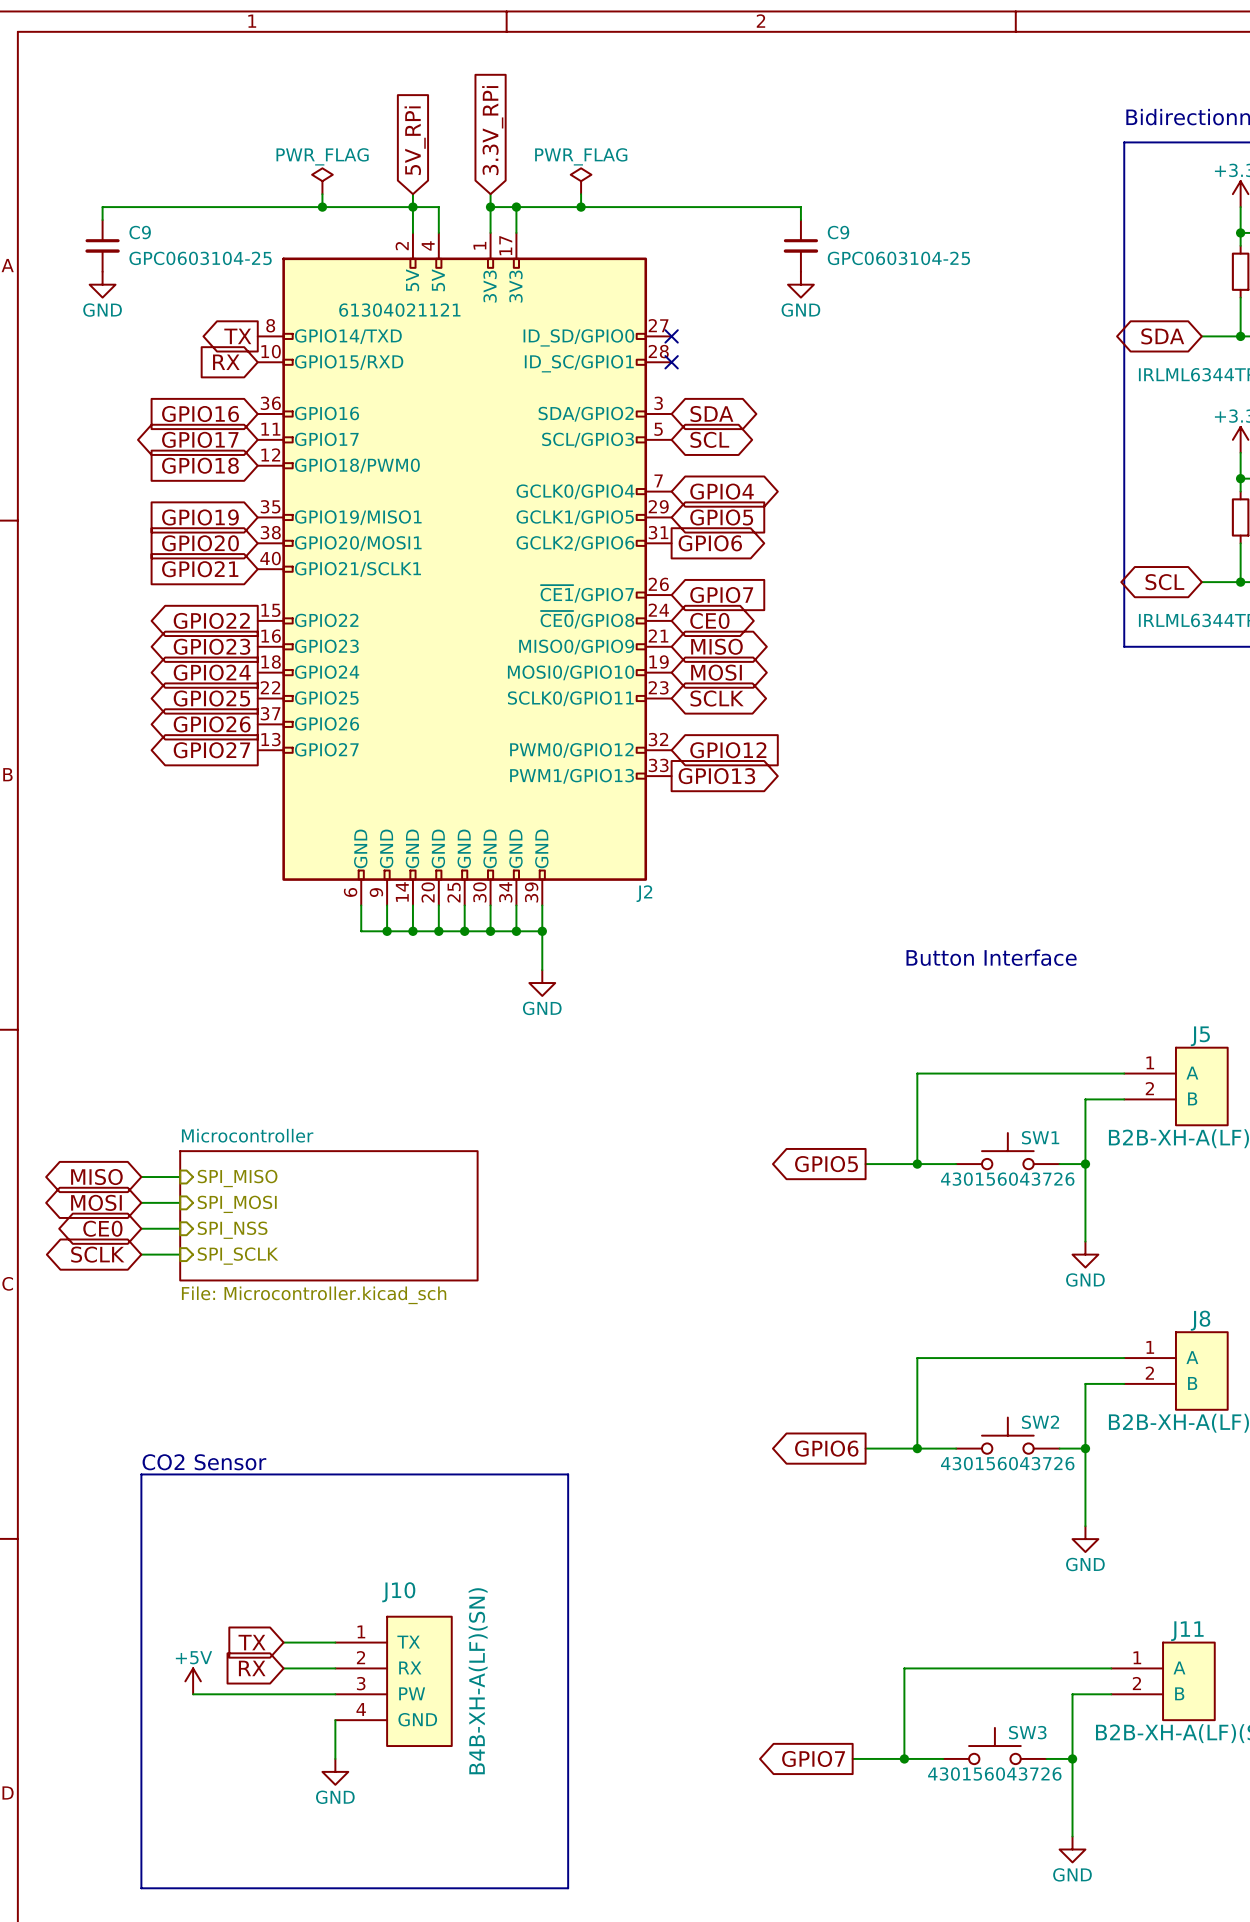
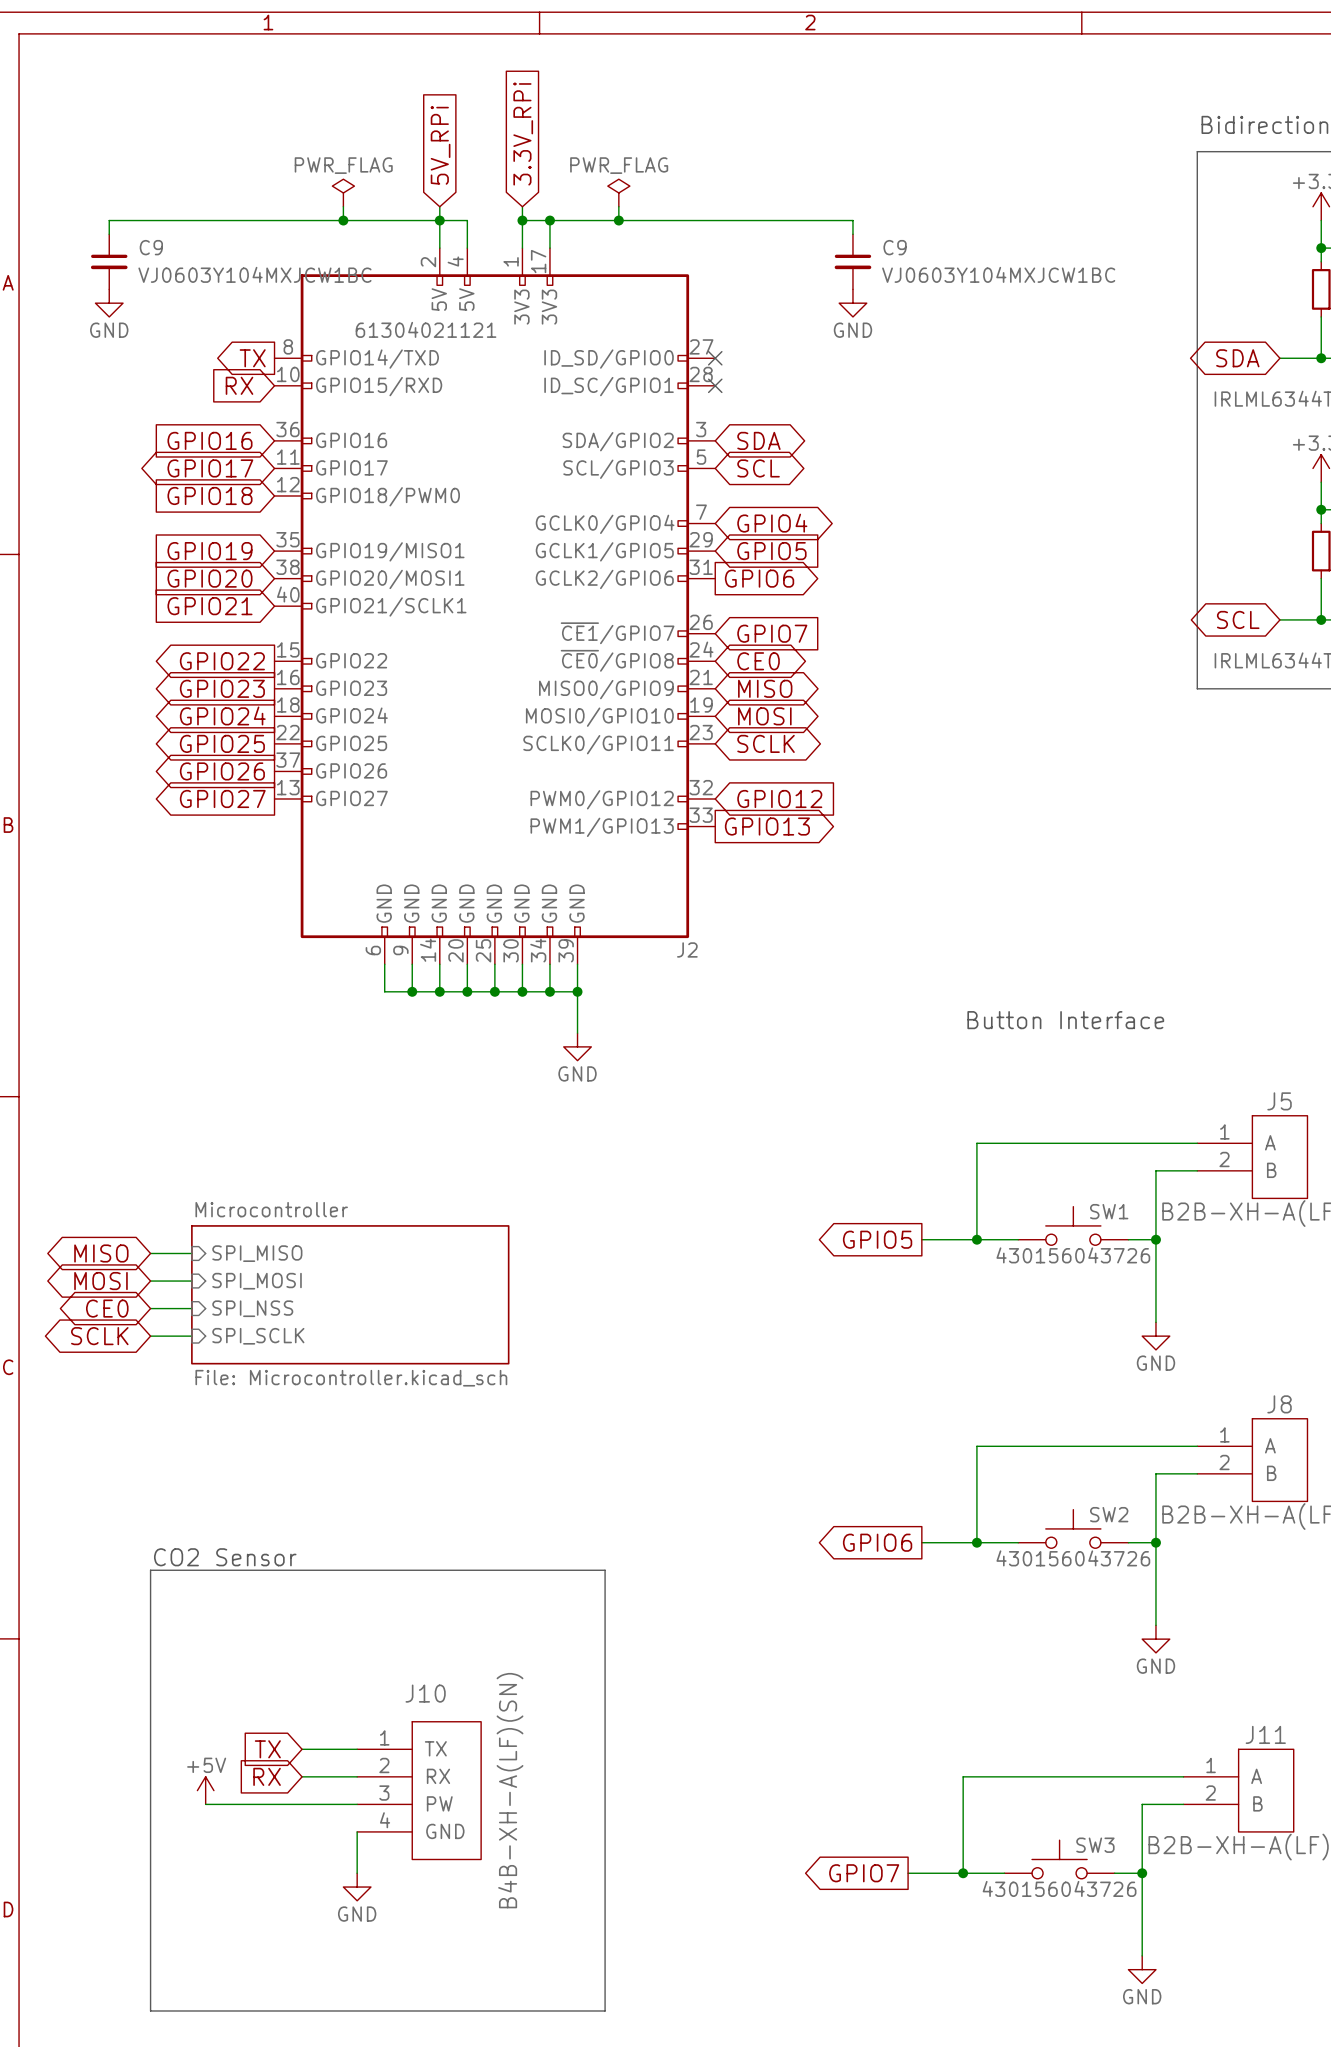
C9 value: GPC0603104-25 (200, 258) -> VJ0603Y104MXJCW1BC (254, 274)
C9 value: GPC0603104-25 (898, 258) -> VJ0603Y104MXJCW1BC (998, 274)

